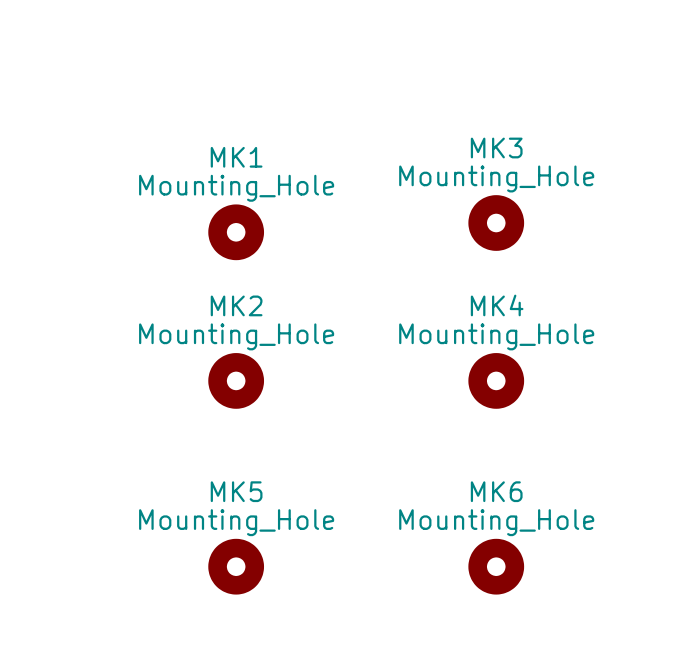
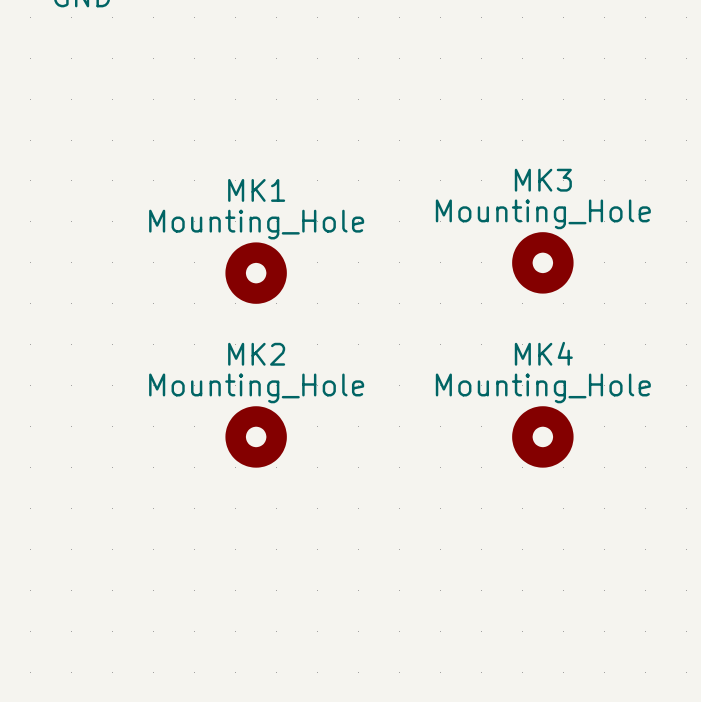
MK5: Mounting_Hole (236, 566) -> none
MK6: Mounting_Hole (496, 566) -> none

